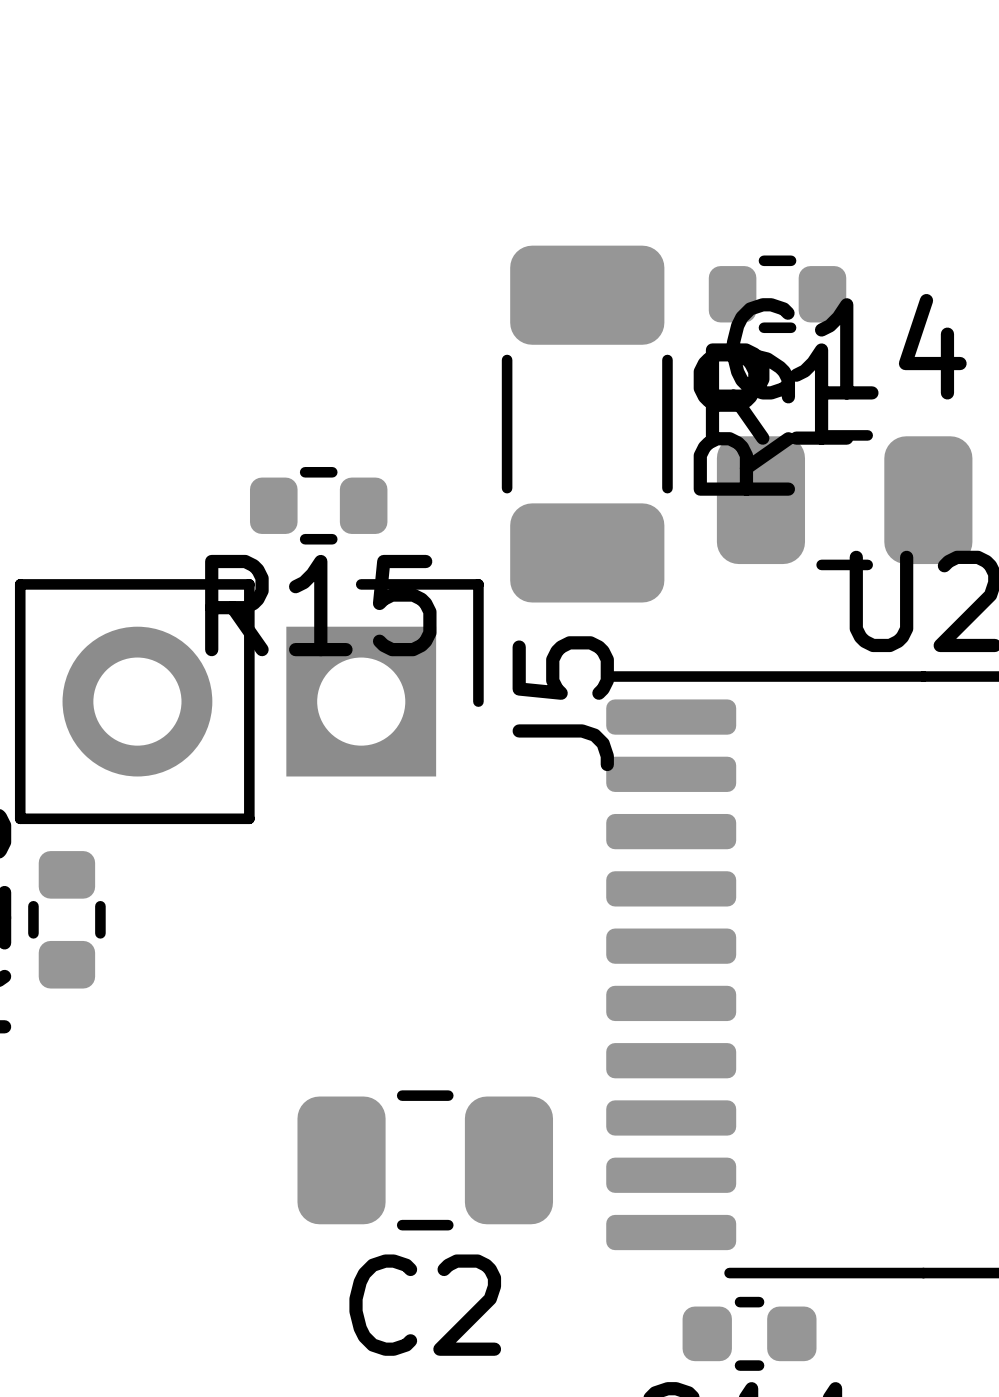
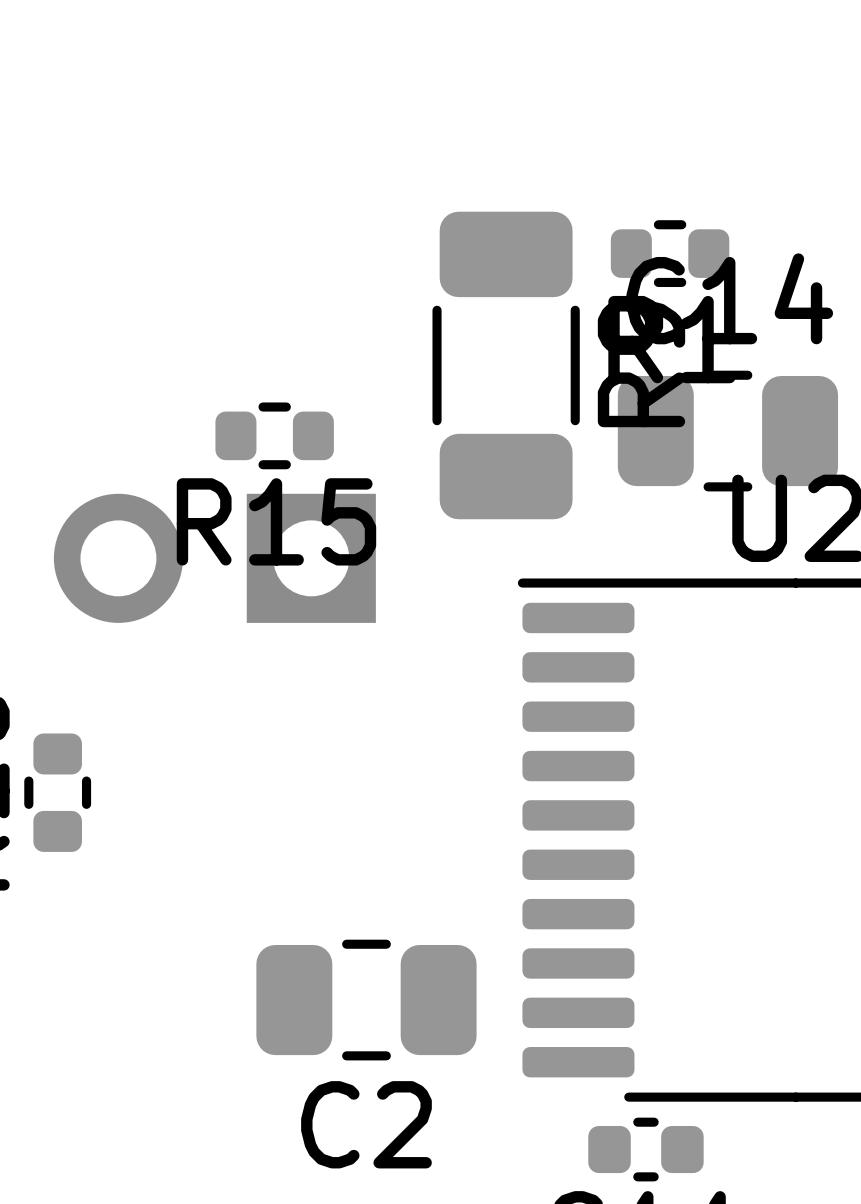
J5 side: top (249, 701) -> bottom (214, 558)

